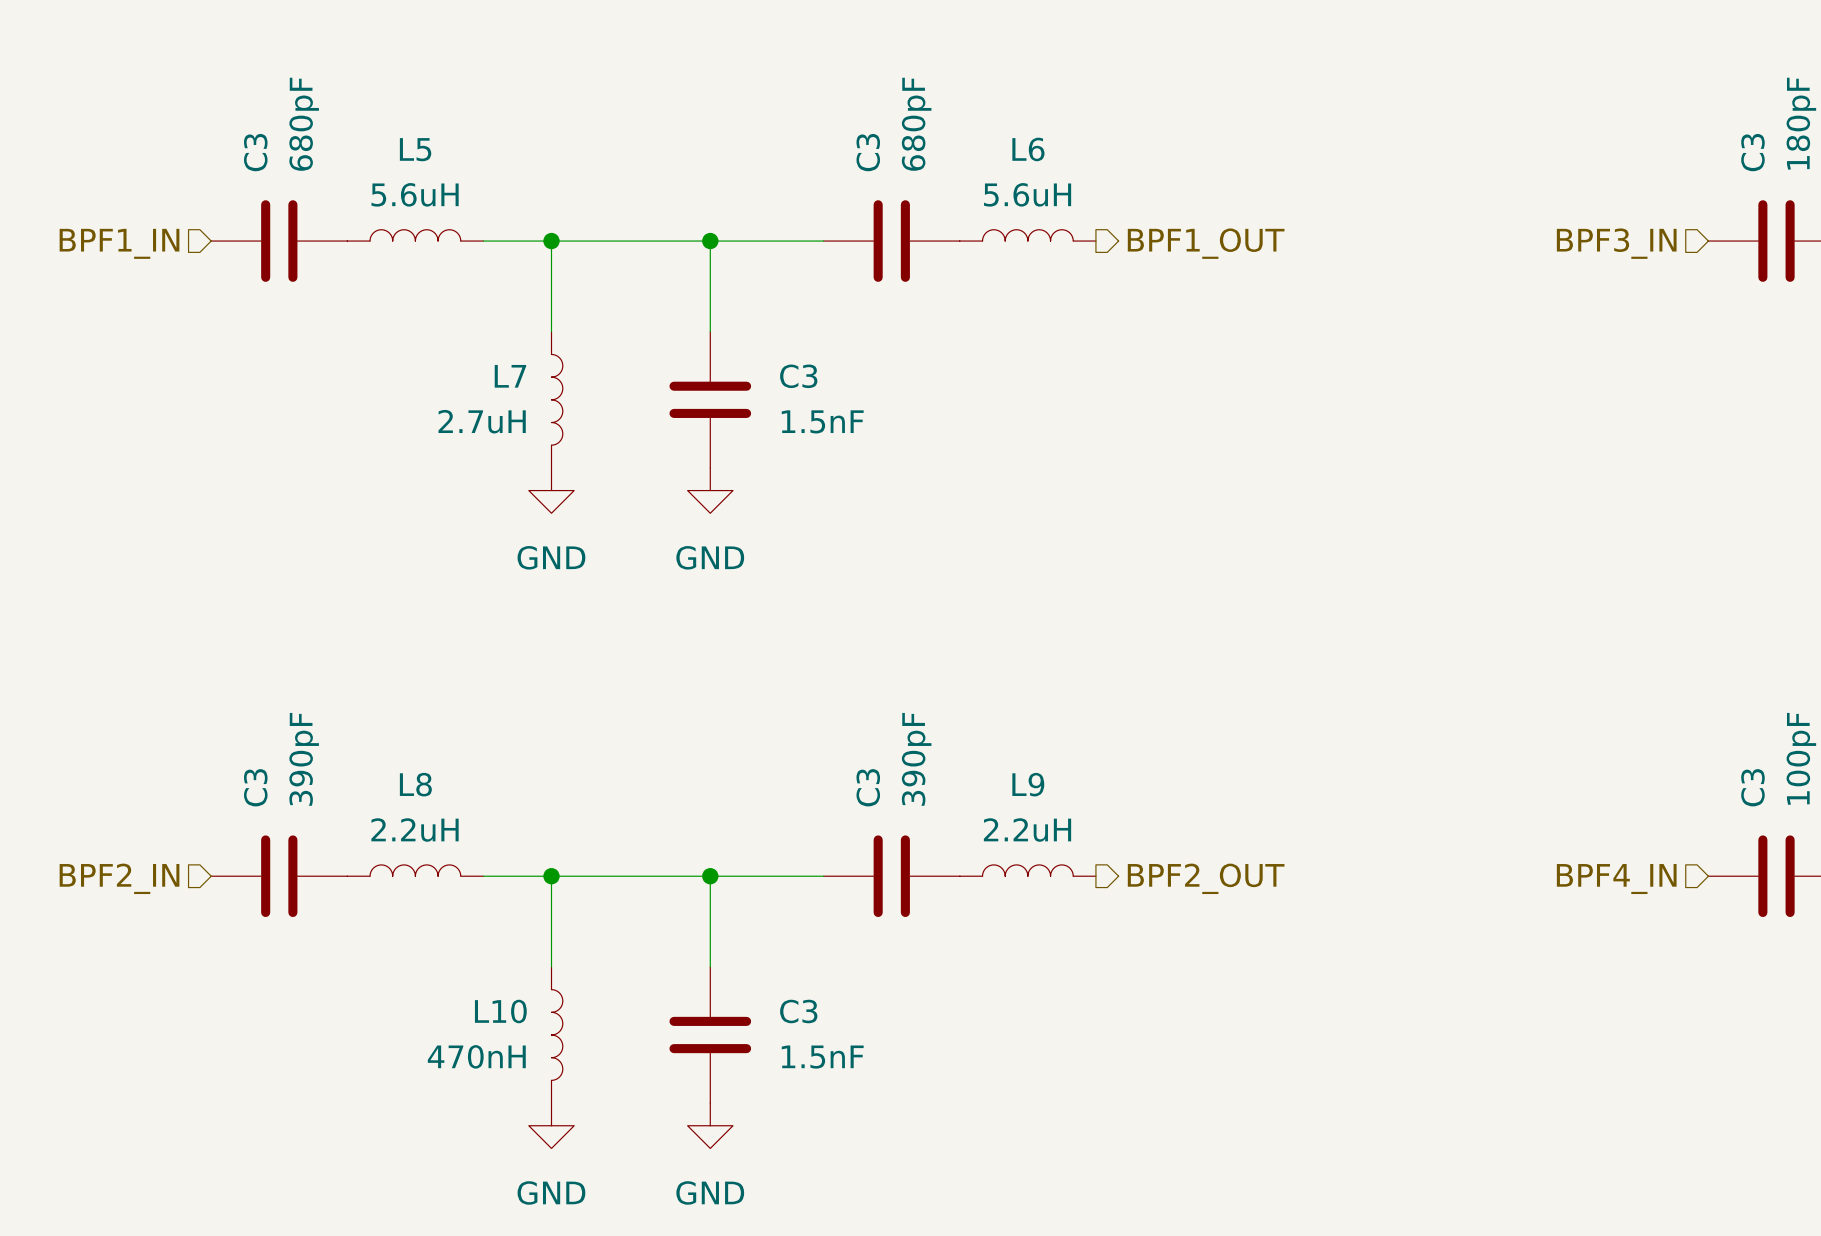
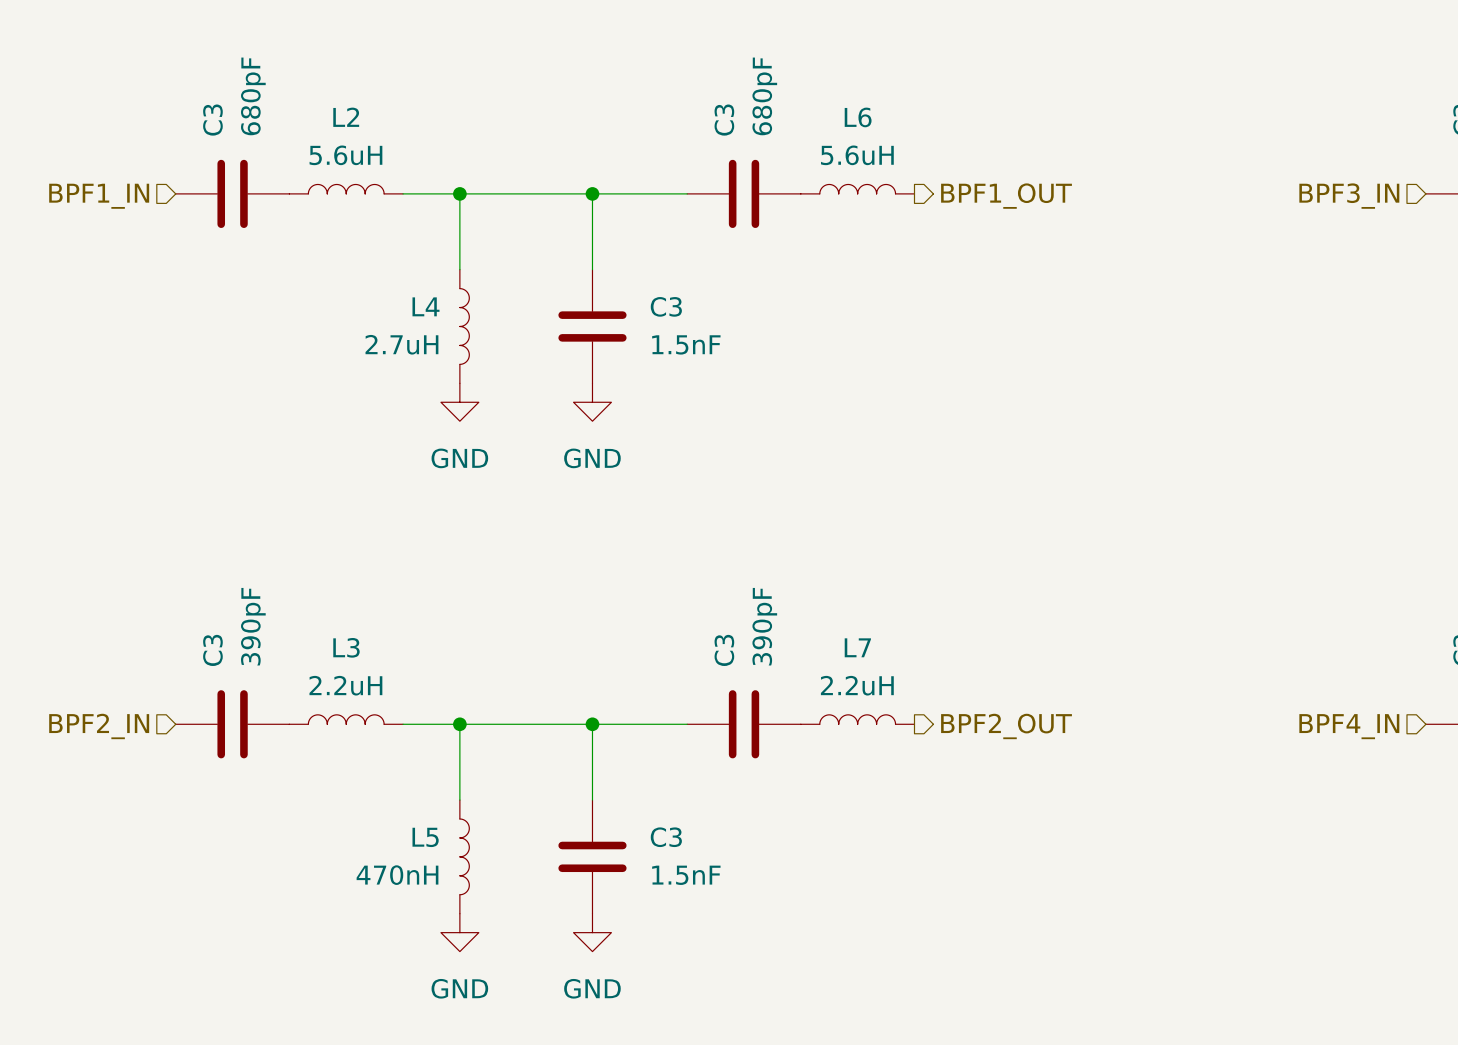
L5 name: L5 (415, 149) -> L2 (346, 117)
L7 name: L7 (510, 376) -> L4 (425, 306)
L8 name: L8 (415, 784) -> L3 (346, 647)
L9 name: L9 (1028, 784) -> L7 (857, 647)
L10 name: L10 (500, 1011) -> L5 (425, 837)

